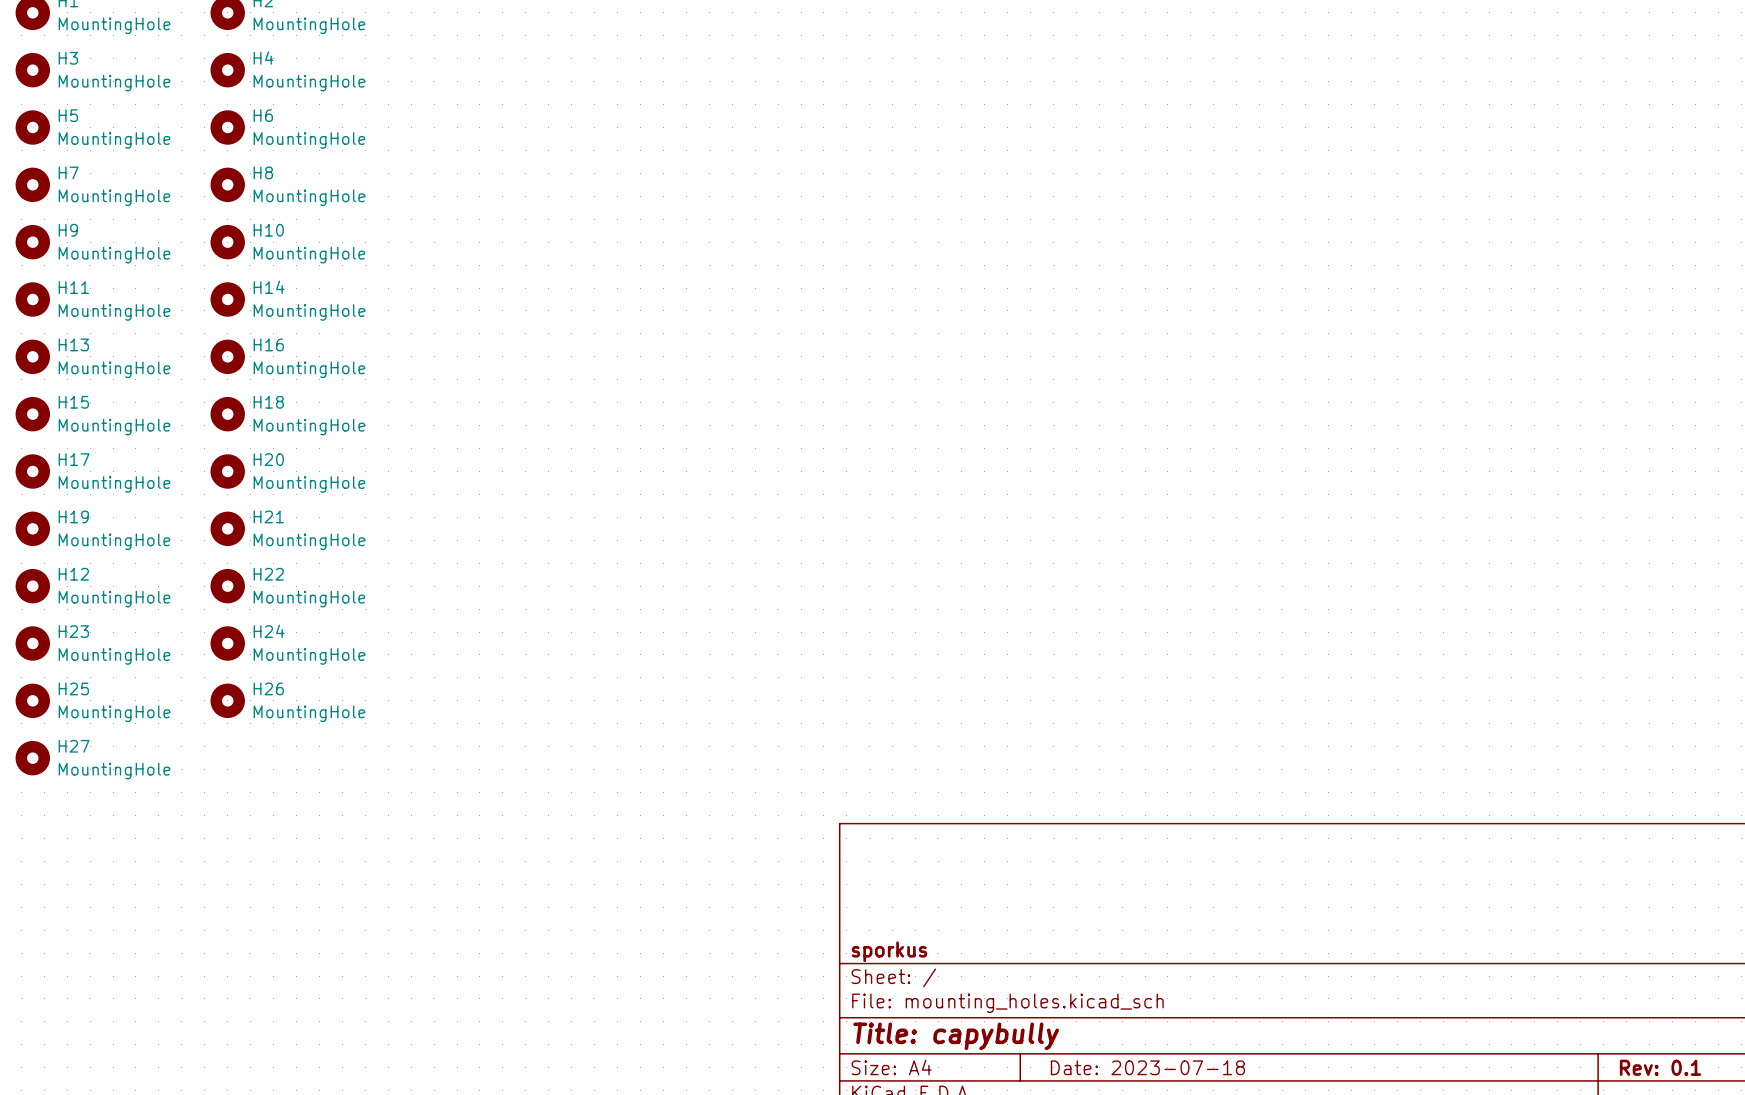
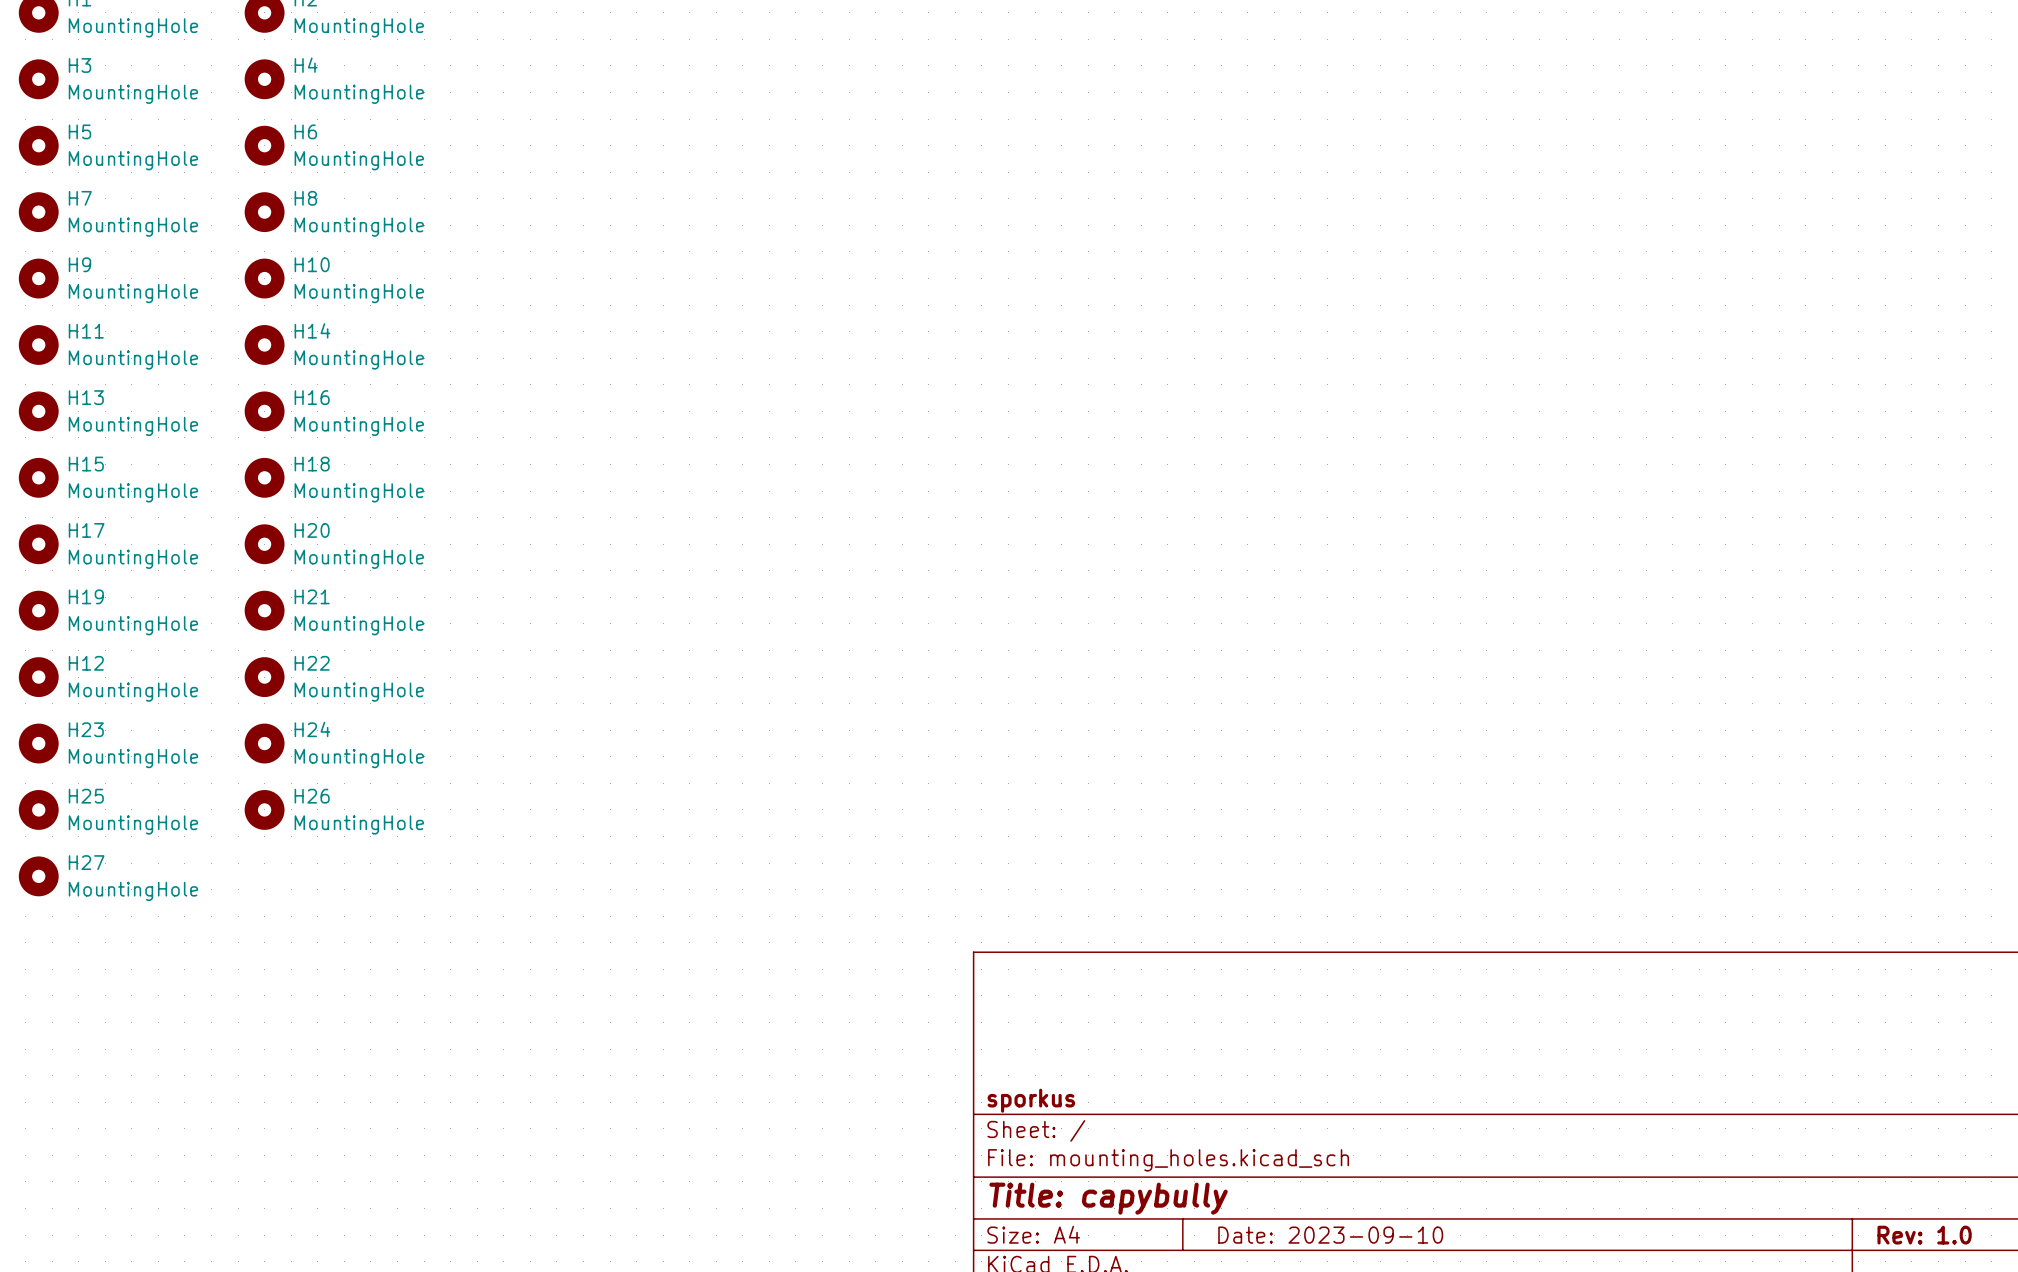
title block: Date: 2023-07-18 (1147, 1067) -> Date: 2023-09-10 (1330, 1235)
title block: Rev: 0.1 (1660, 1067) -> Rev: 1.0 (1924, 1235)

